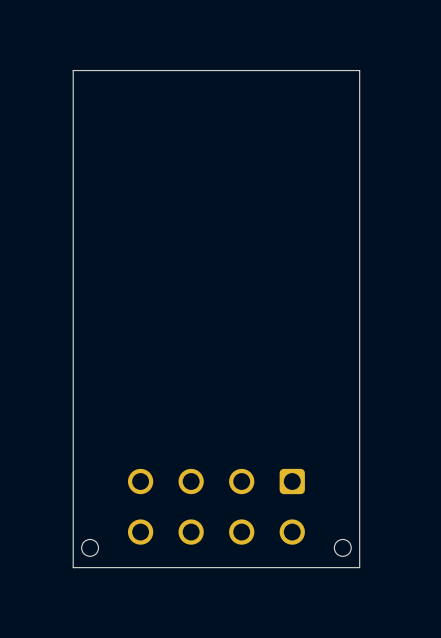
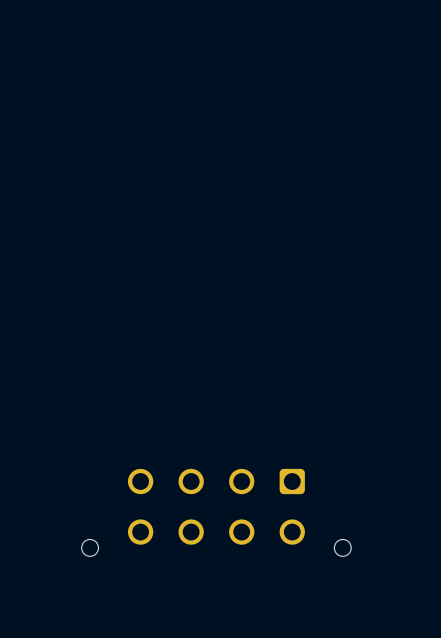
board edge: (359, 70) (359, 567) (73, 567) (73, 70) (359, 70) -> none

